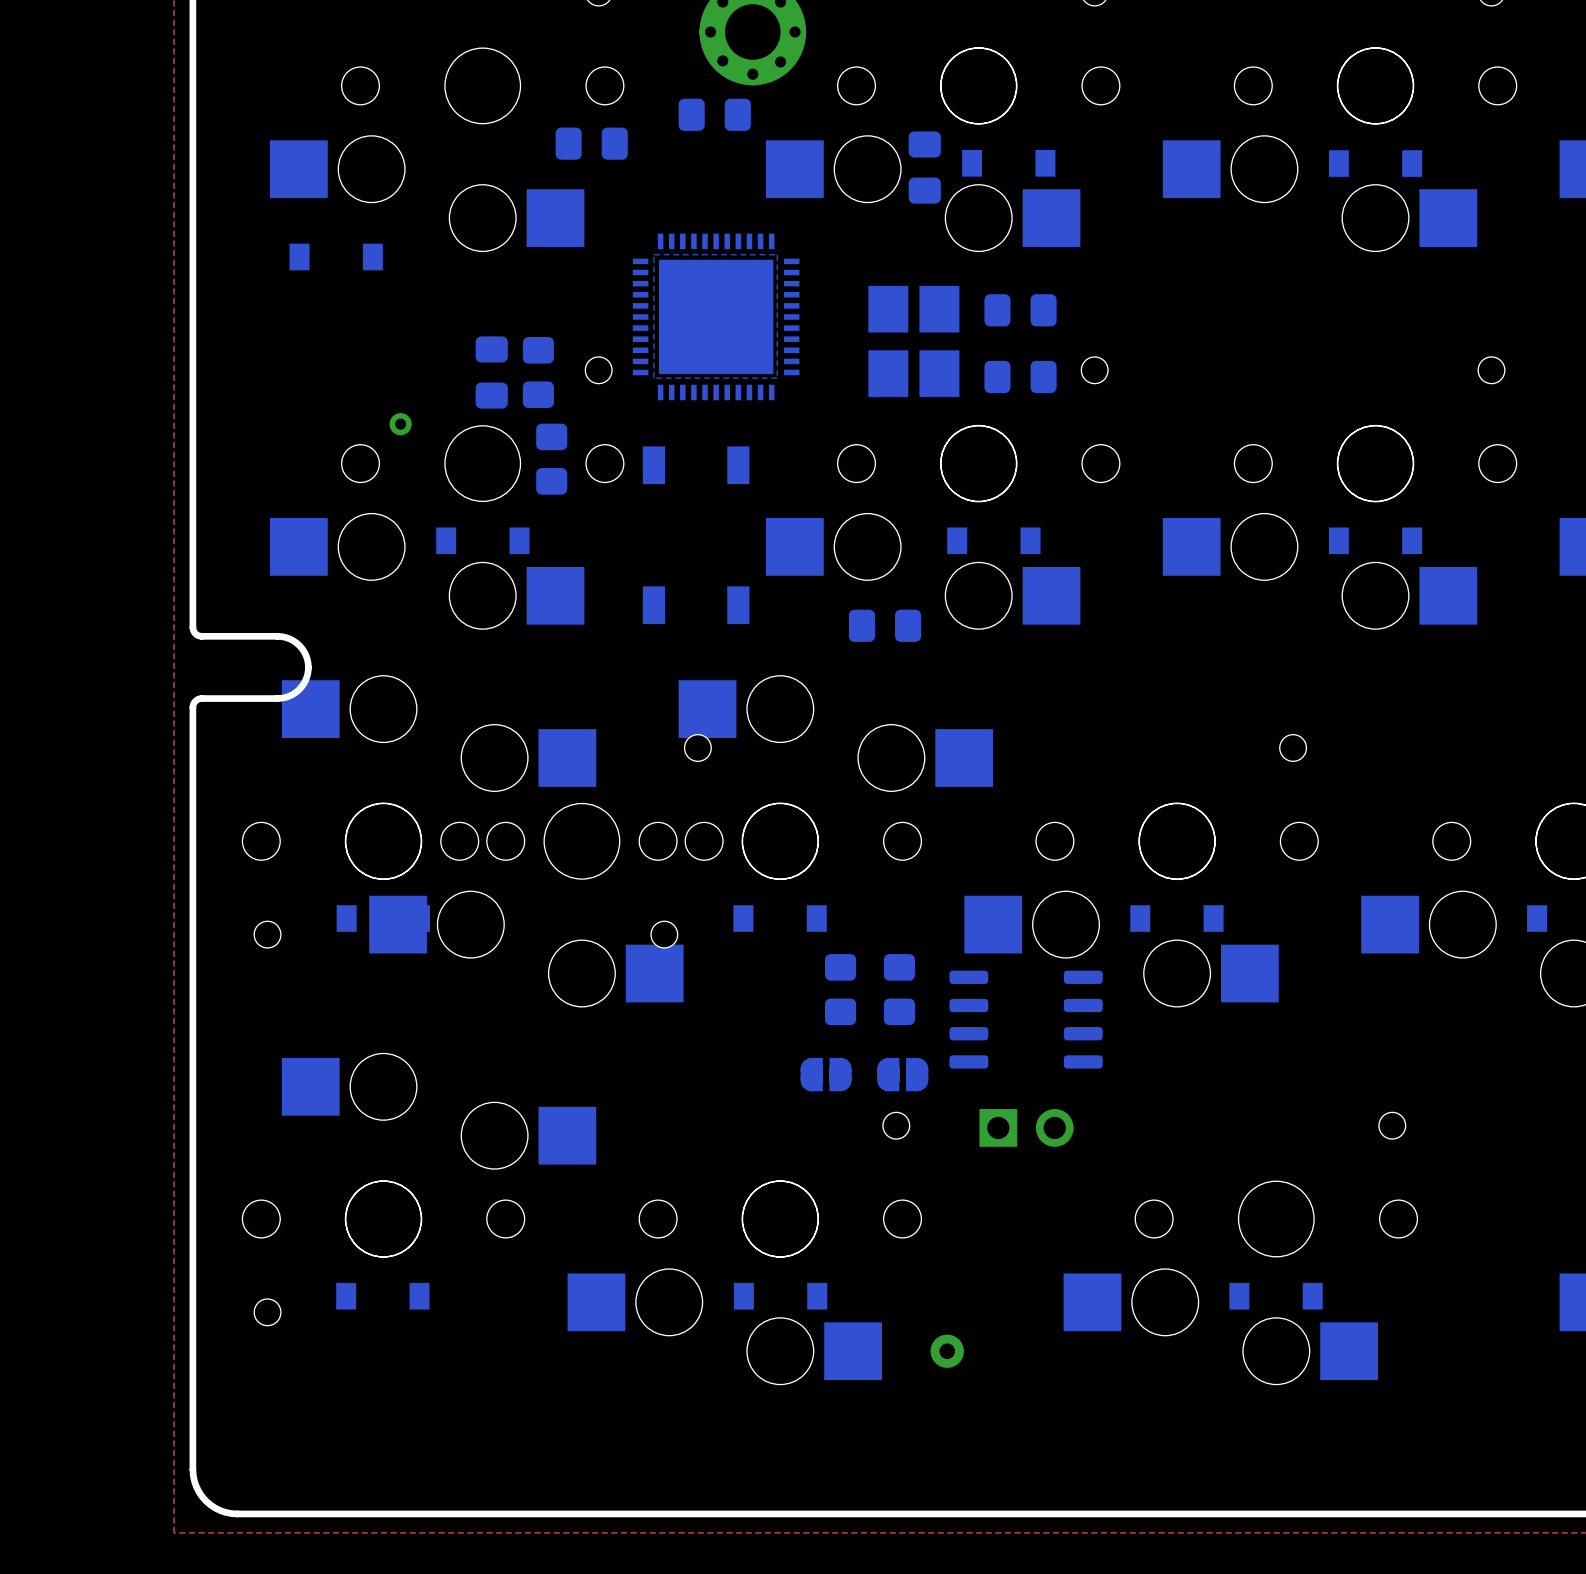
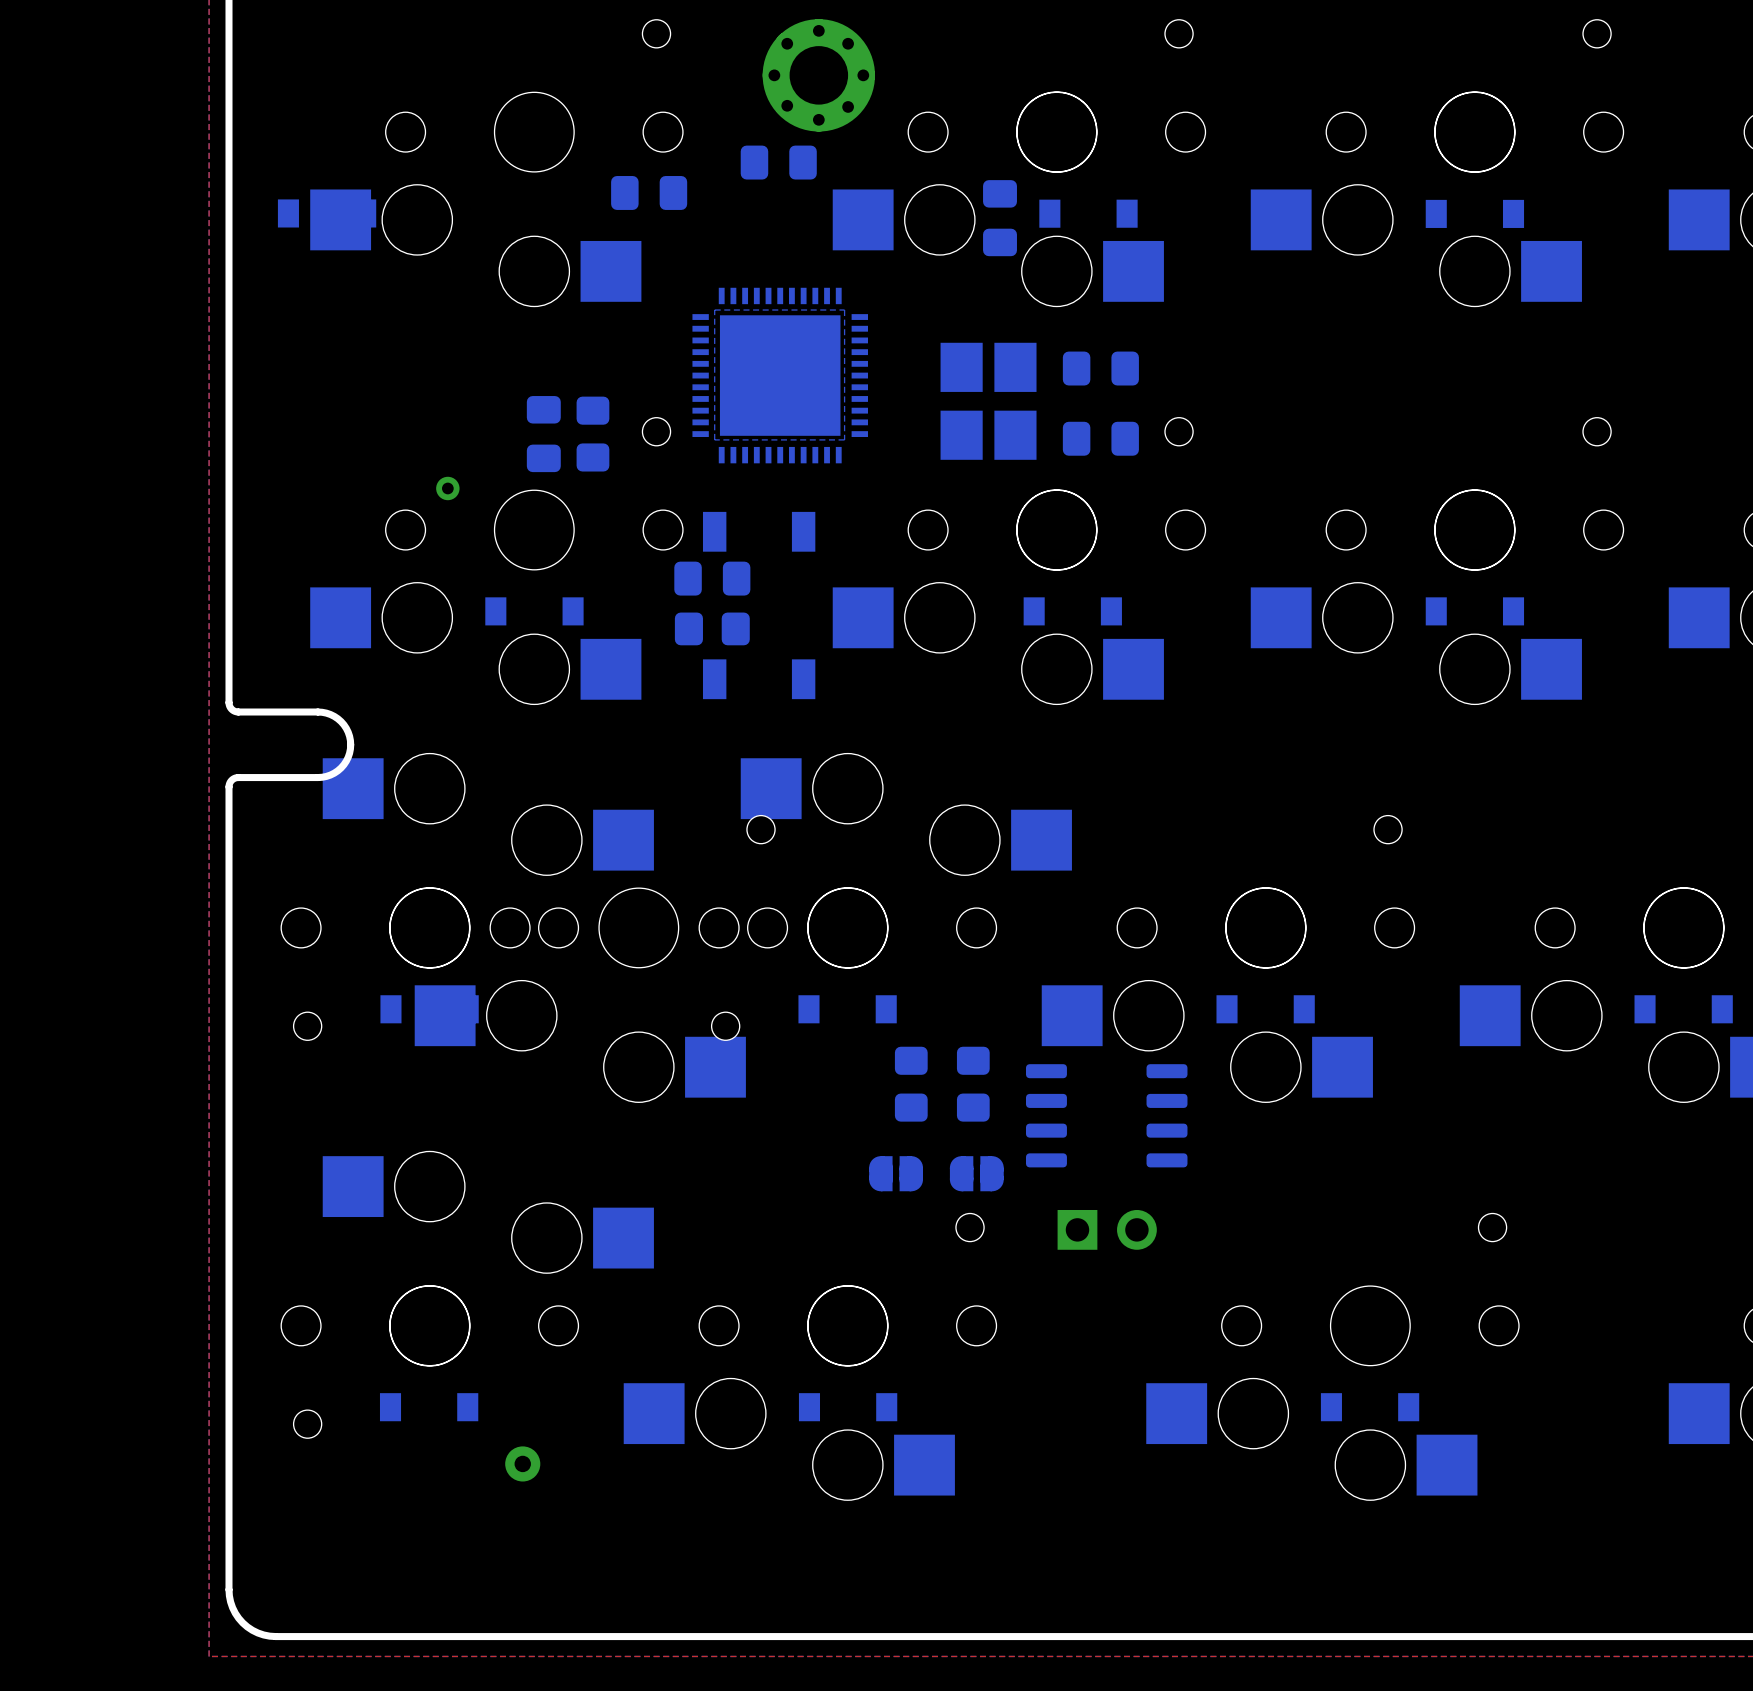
part position: (336, 256) -> (327, 213)
part rotation: 0° (551, 459) -> 90° clockwise (712, 628)
part position: (551, 459) -> (712, 628)
part position: (884, 625) -> (712, 578)
part position: (947, 1351) -> (522, 1463)

